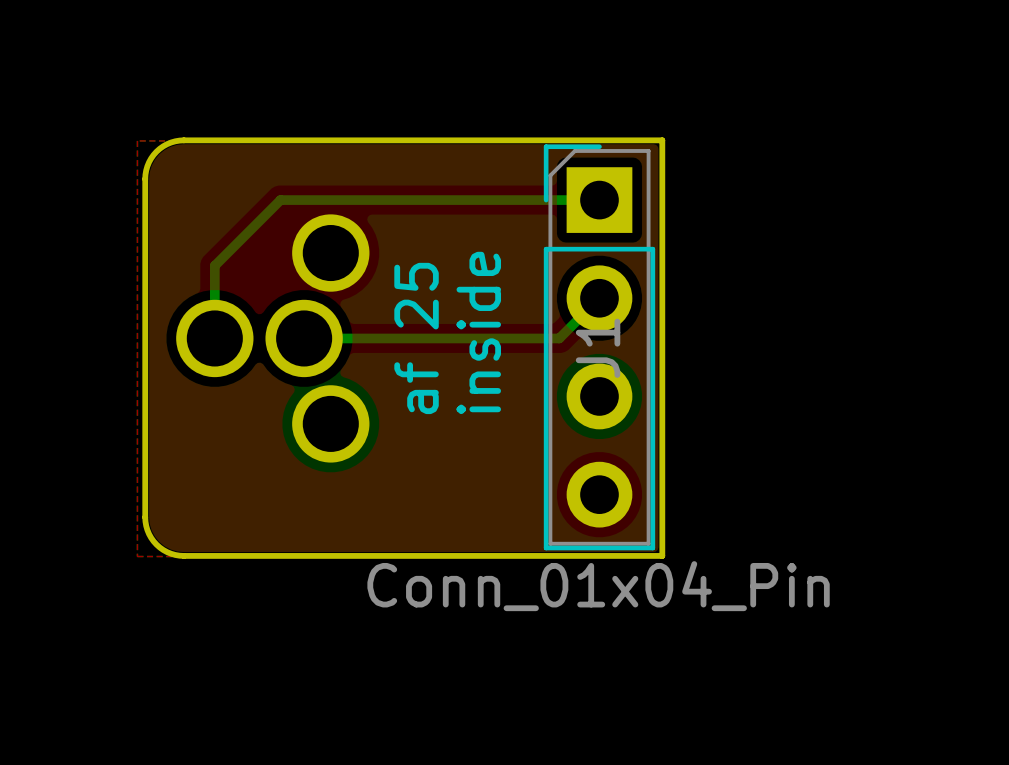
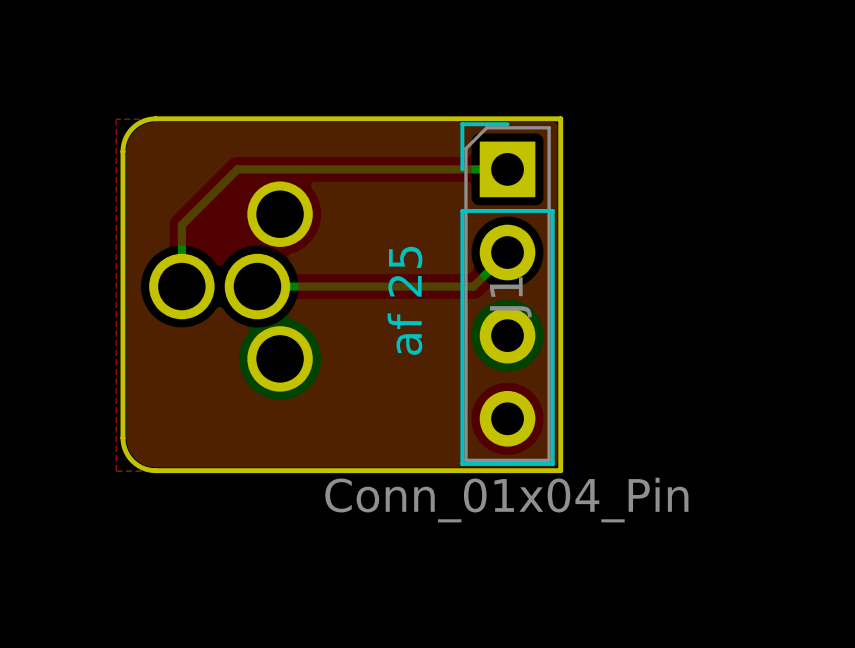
text: inside (478, 332) -> af 25 (404, 300)
text: af 25 (416, 338) -> none

